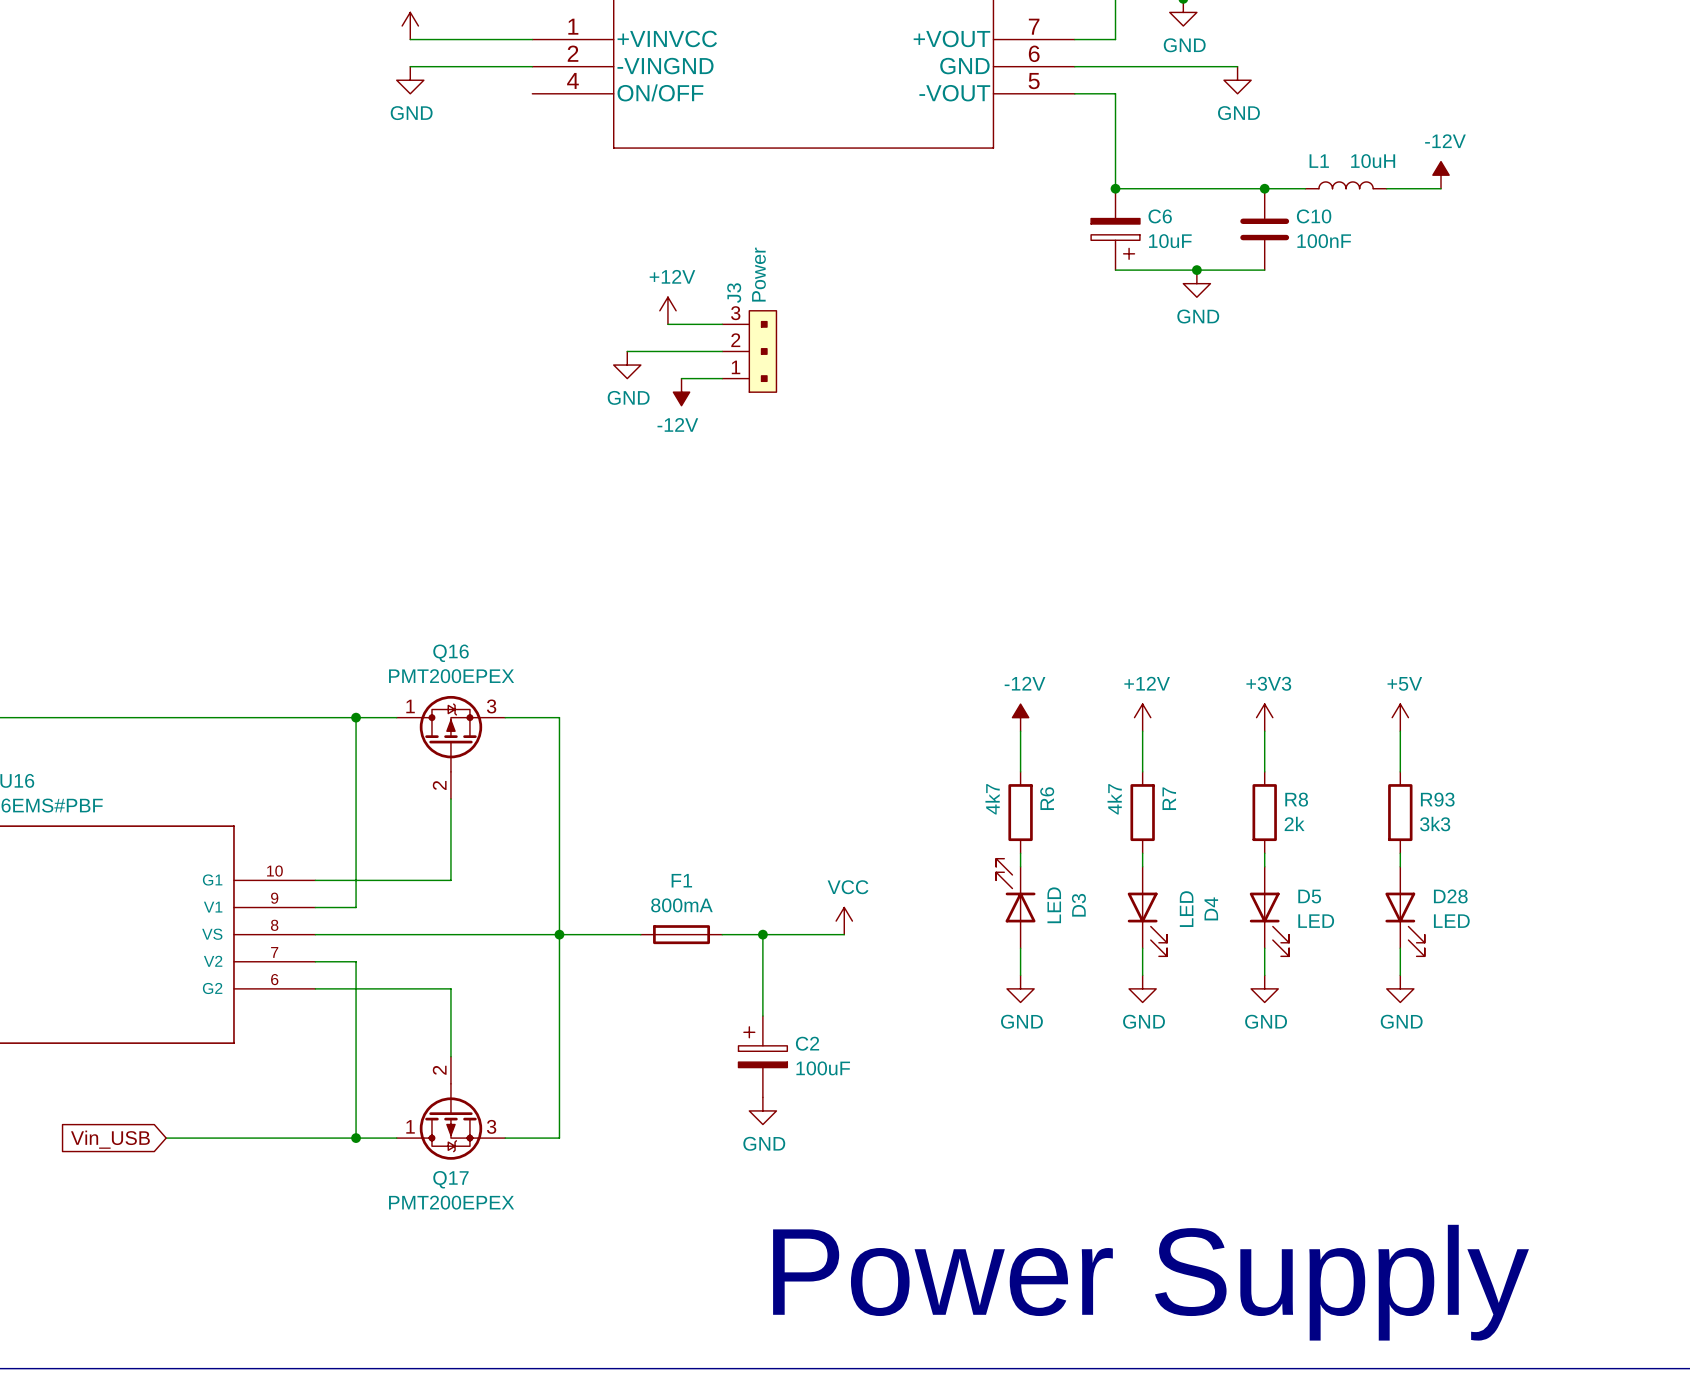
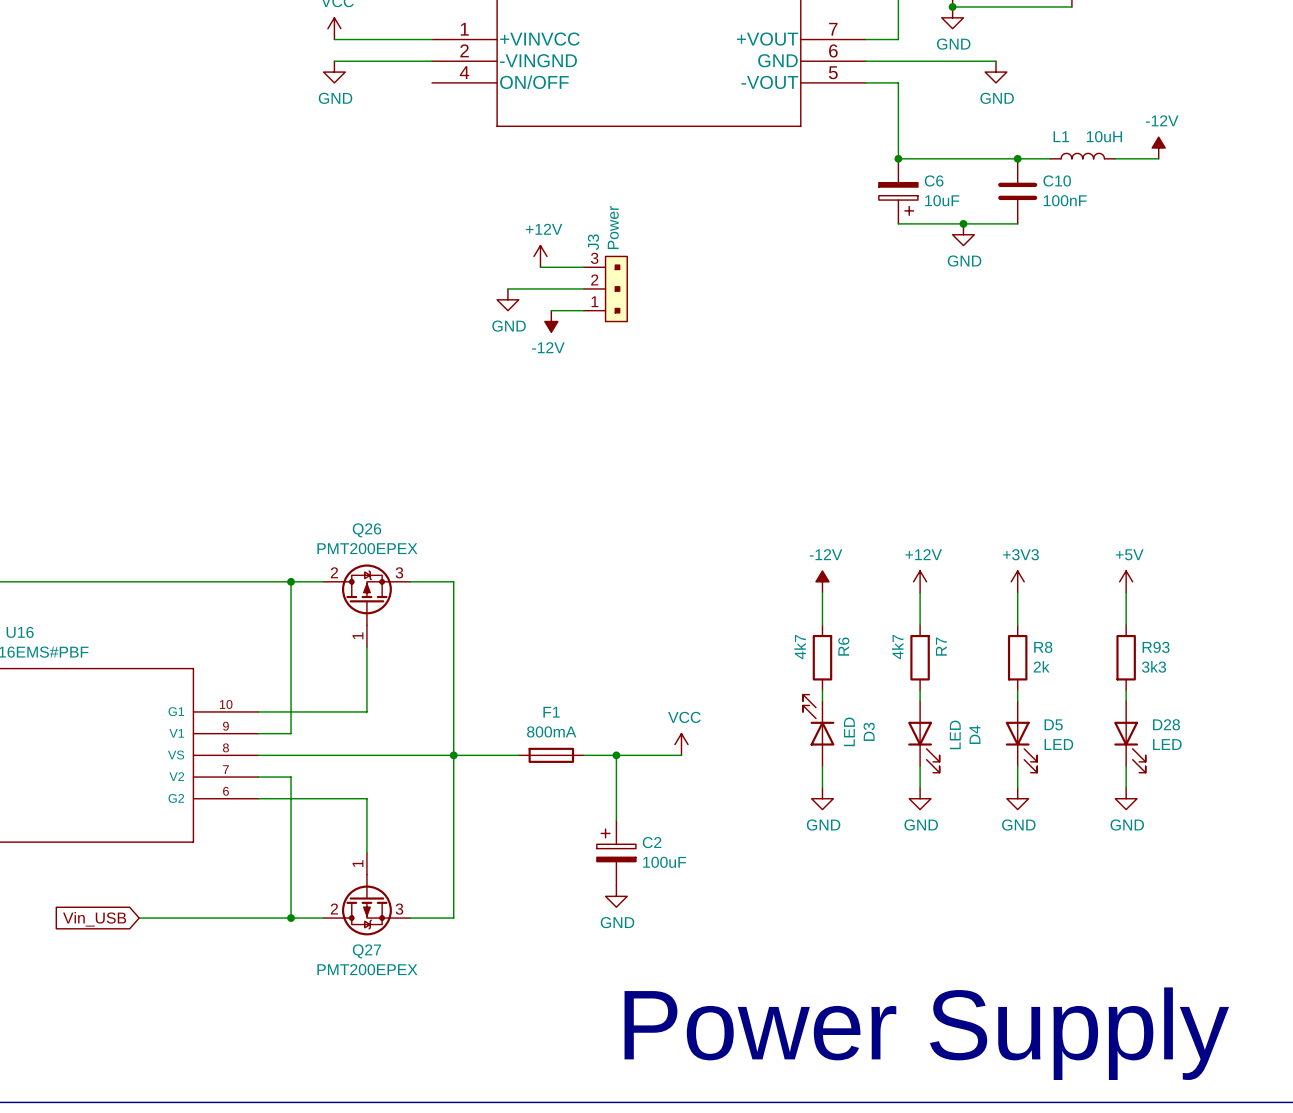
Q16 name: Q16 (451, 653) -> Q26 (366, 530)
Q16 pin number: 1 (410, 706) -> 2 (334, 572)
Q16 pin number: 2 (439, 785) -> 1 (358, 635)
Q17 pin number: 2 (439, 1070) -> 1 (358, 863)
Q17 pin number: 1 (410, 1126) -> 2 (334, 909)
Q17 name: Q17 (450, 1179) -> Q27 (366, 951)

